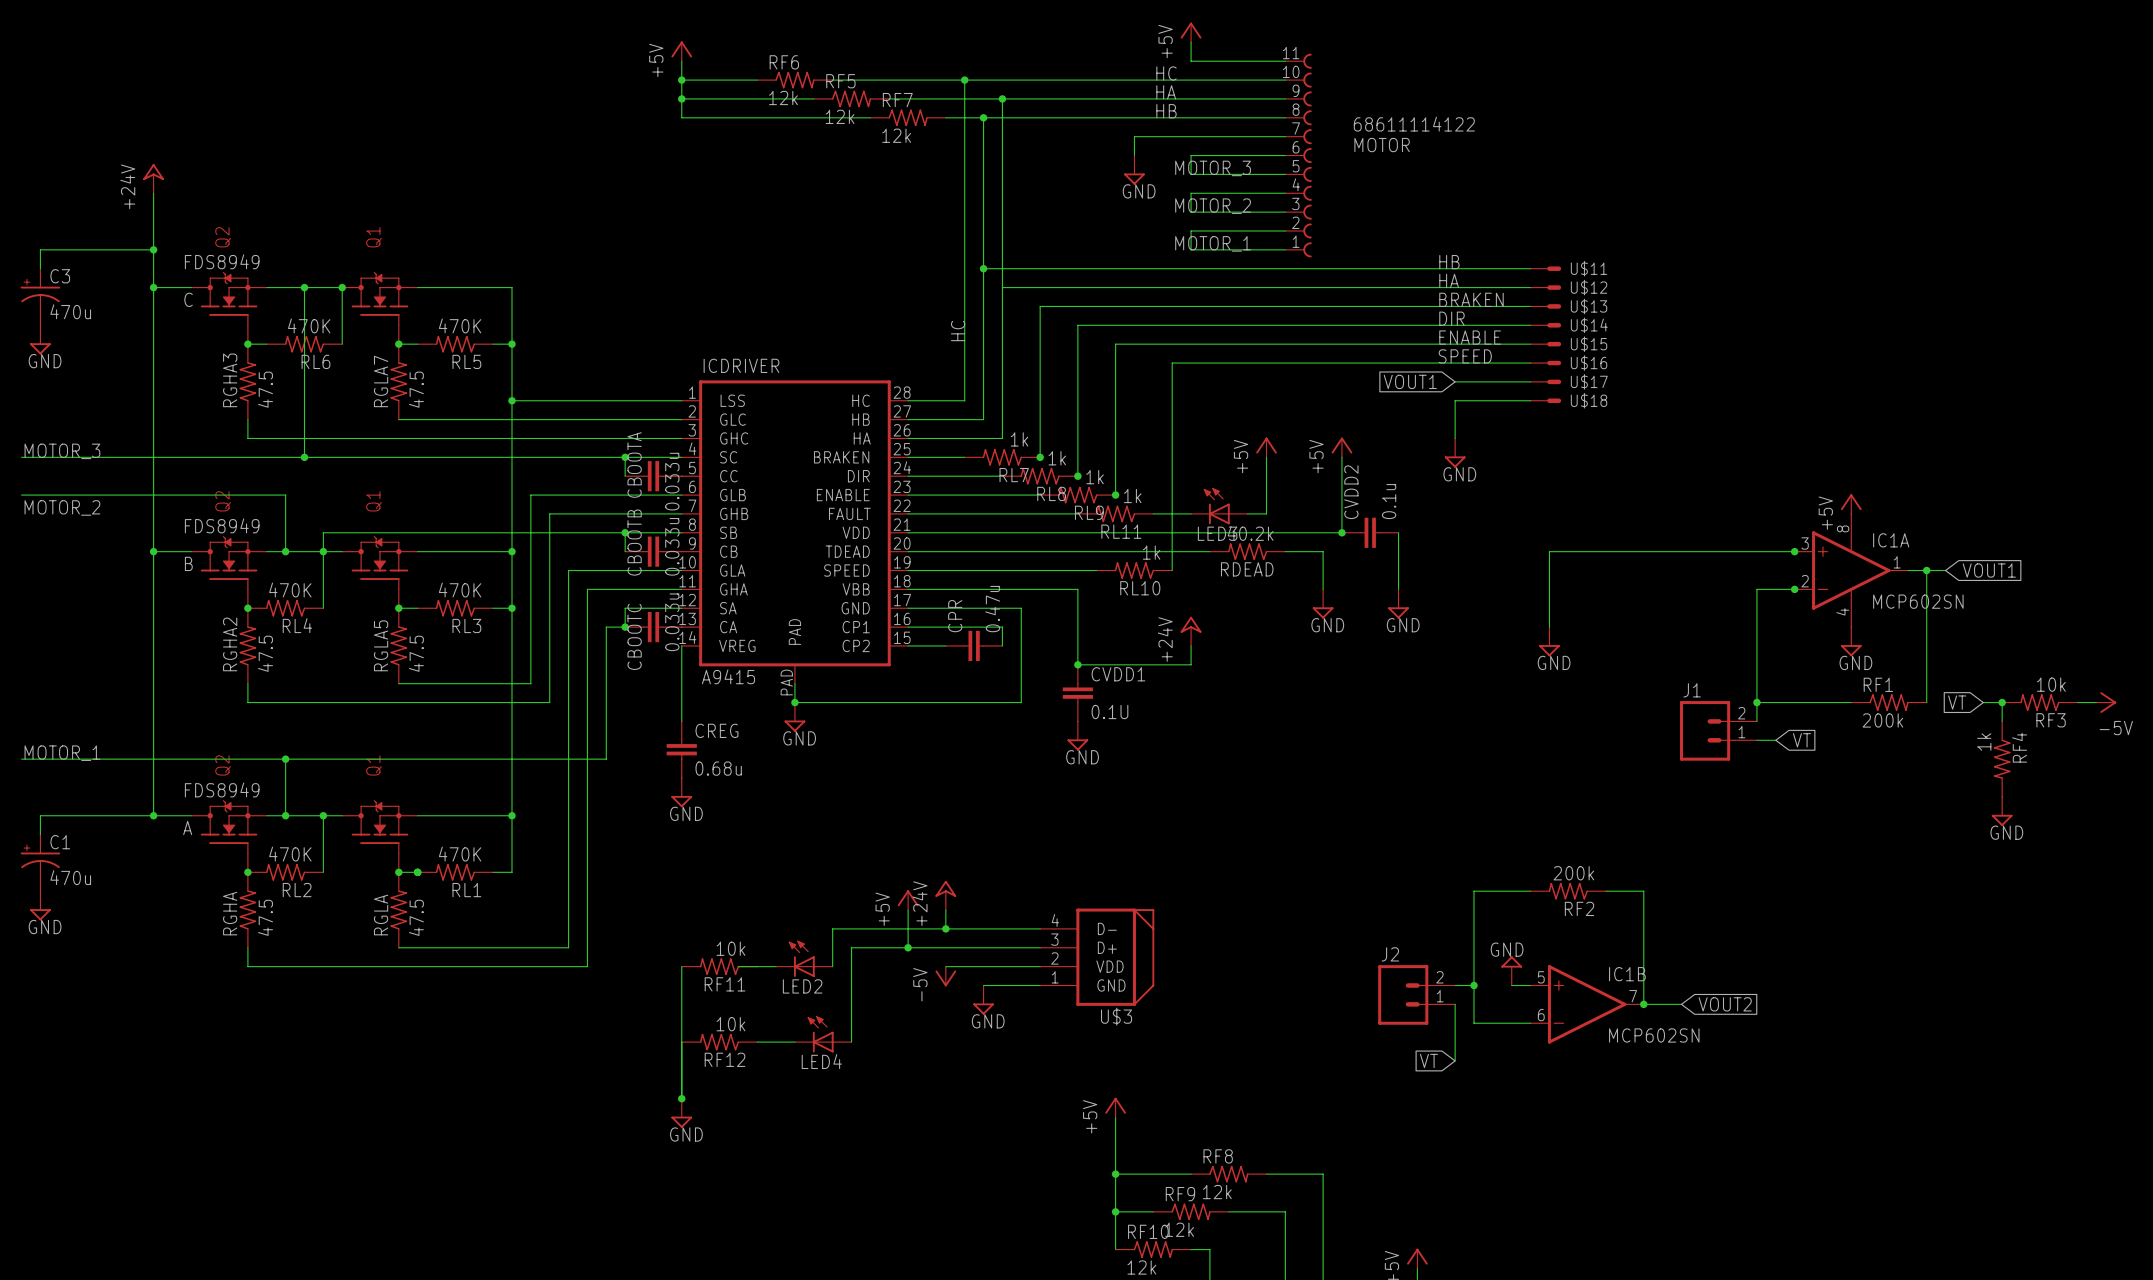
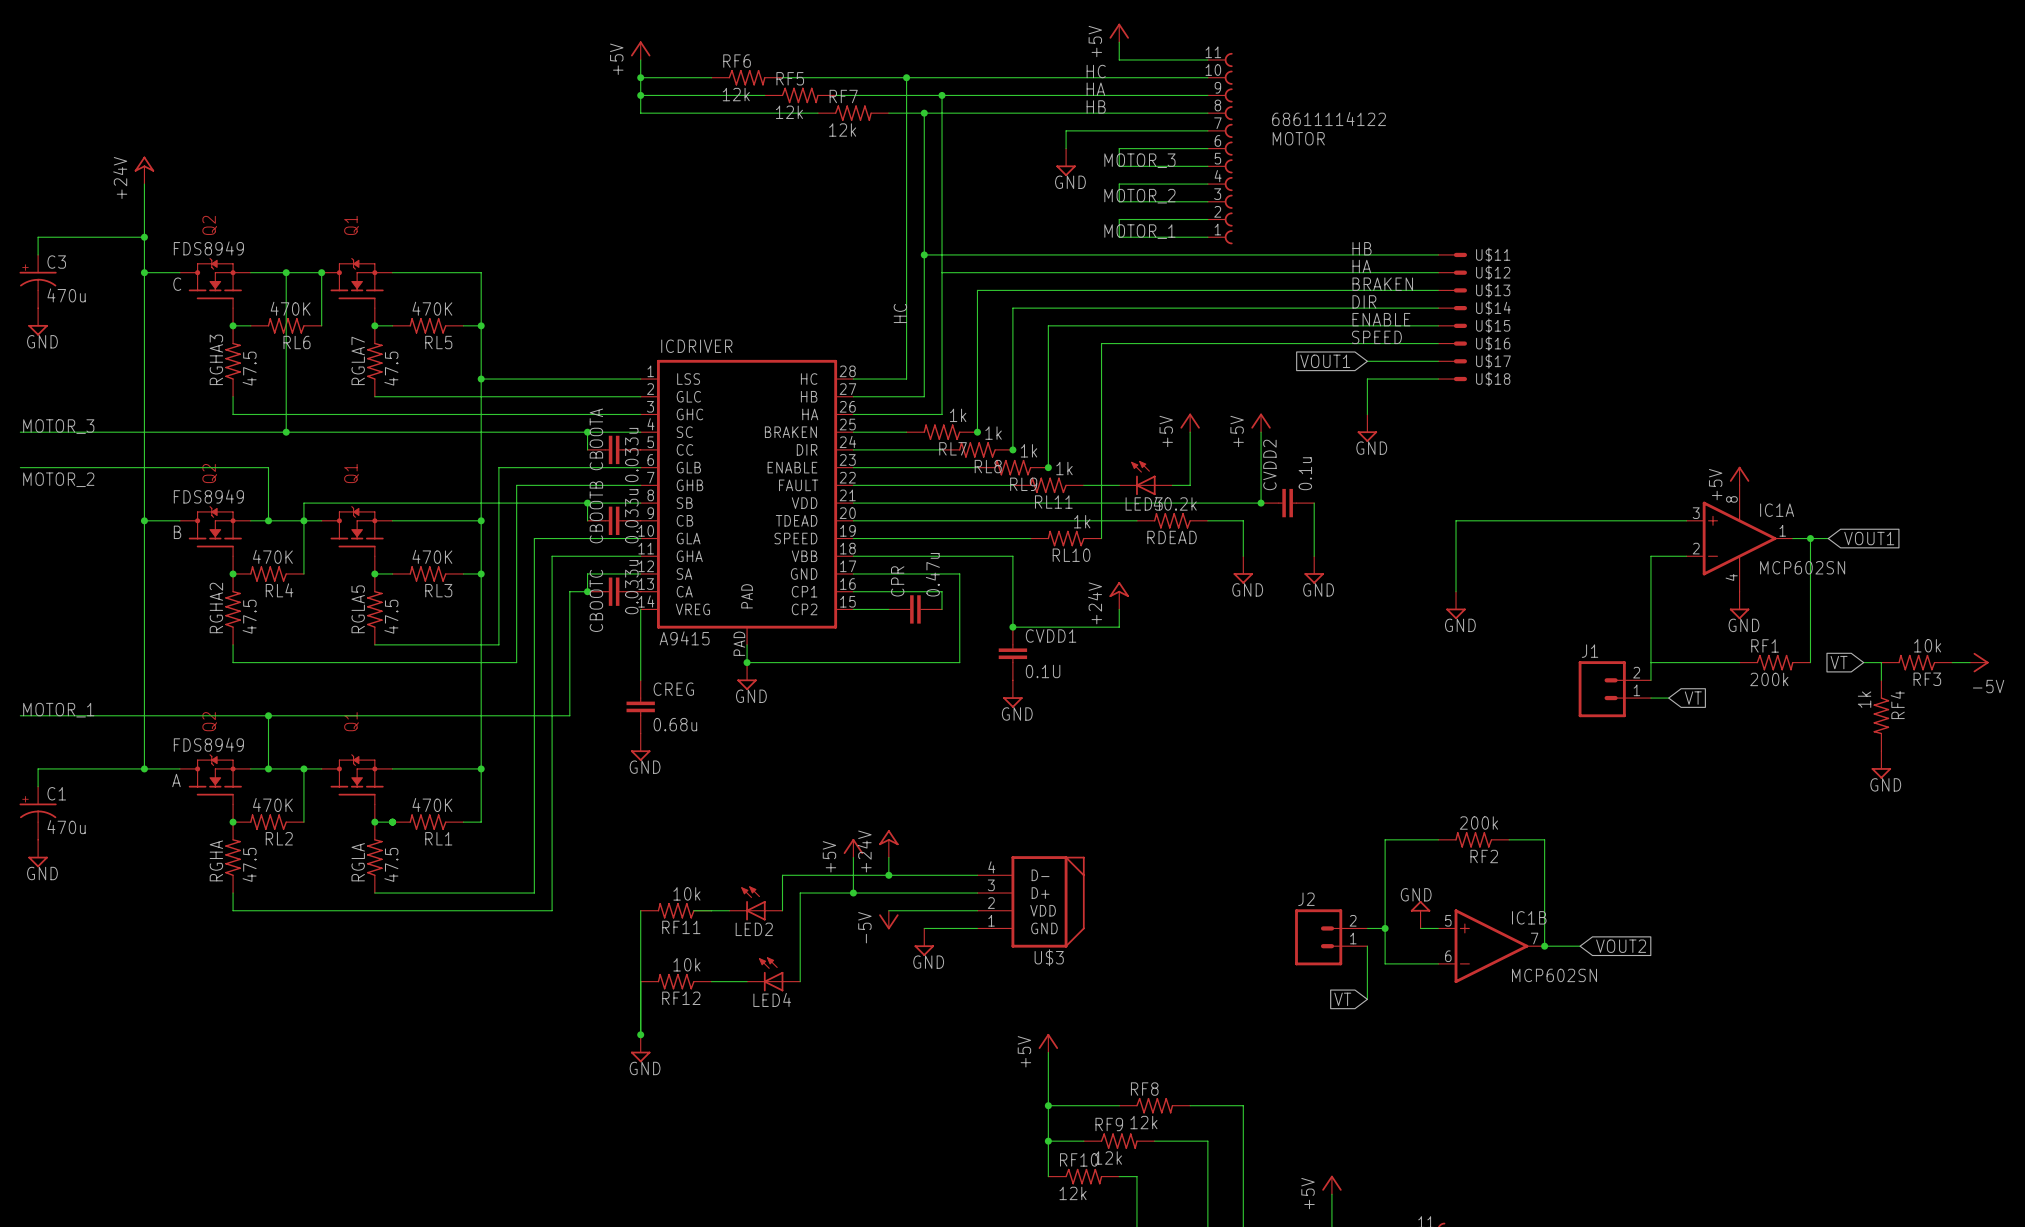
junction: (1794, 551) -> none
junction: (1794, 589) -> none
junction: (1756, 702) -> none
junction: (2002, 702) -> none

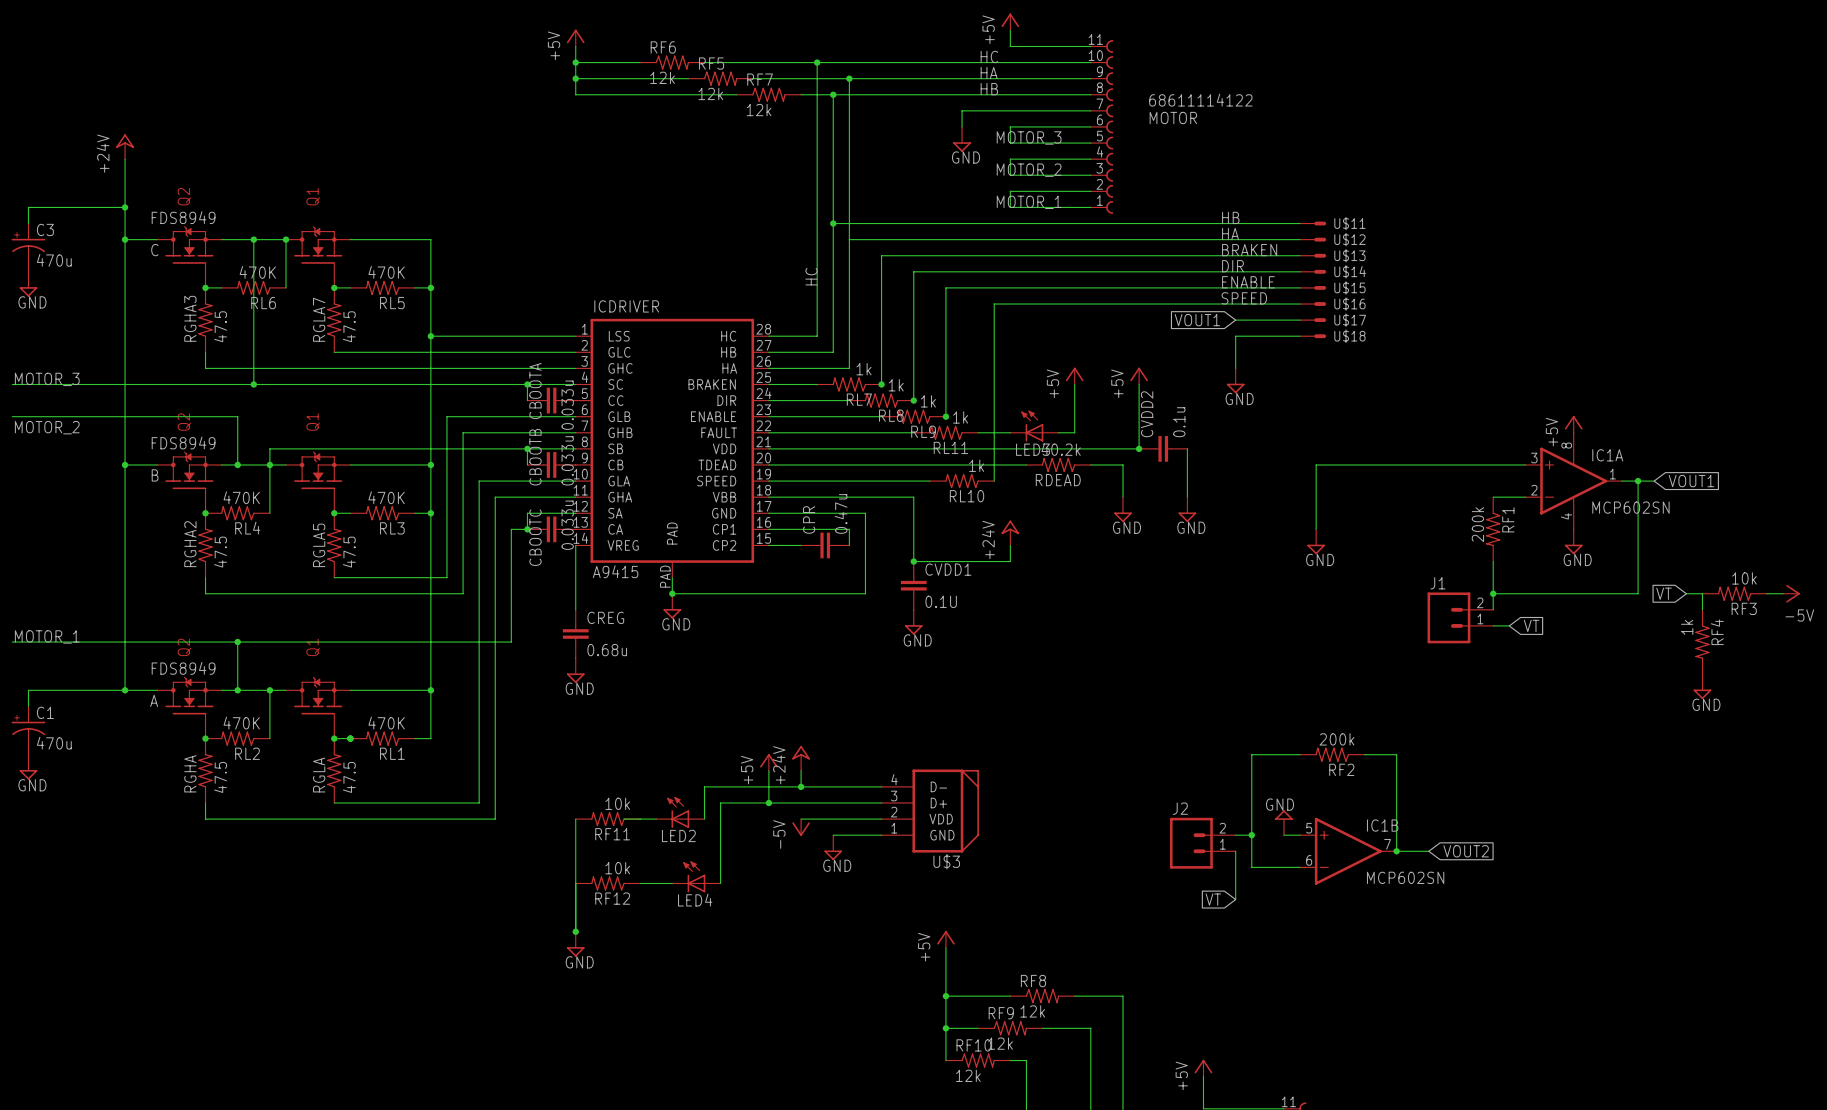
junction: none -> (1493, 593)
RF1 rotation: 0° (1775, 662) -> 90° clockwise (1493, 529)
RF1 position: (1775, 662) -> (1493, 529)

